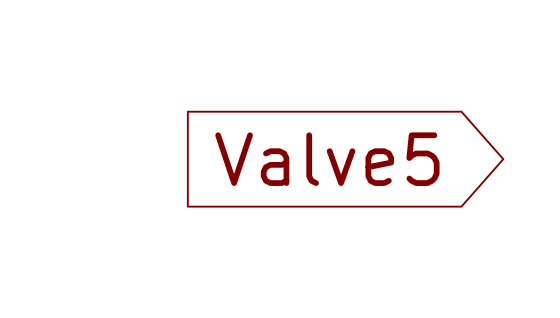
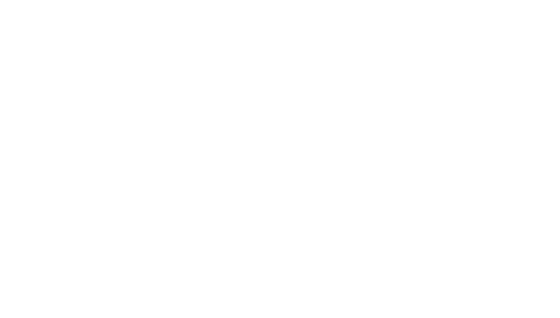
global label: Valve5 (327, 159) -> none

